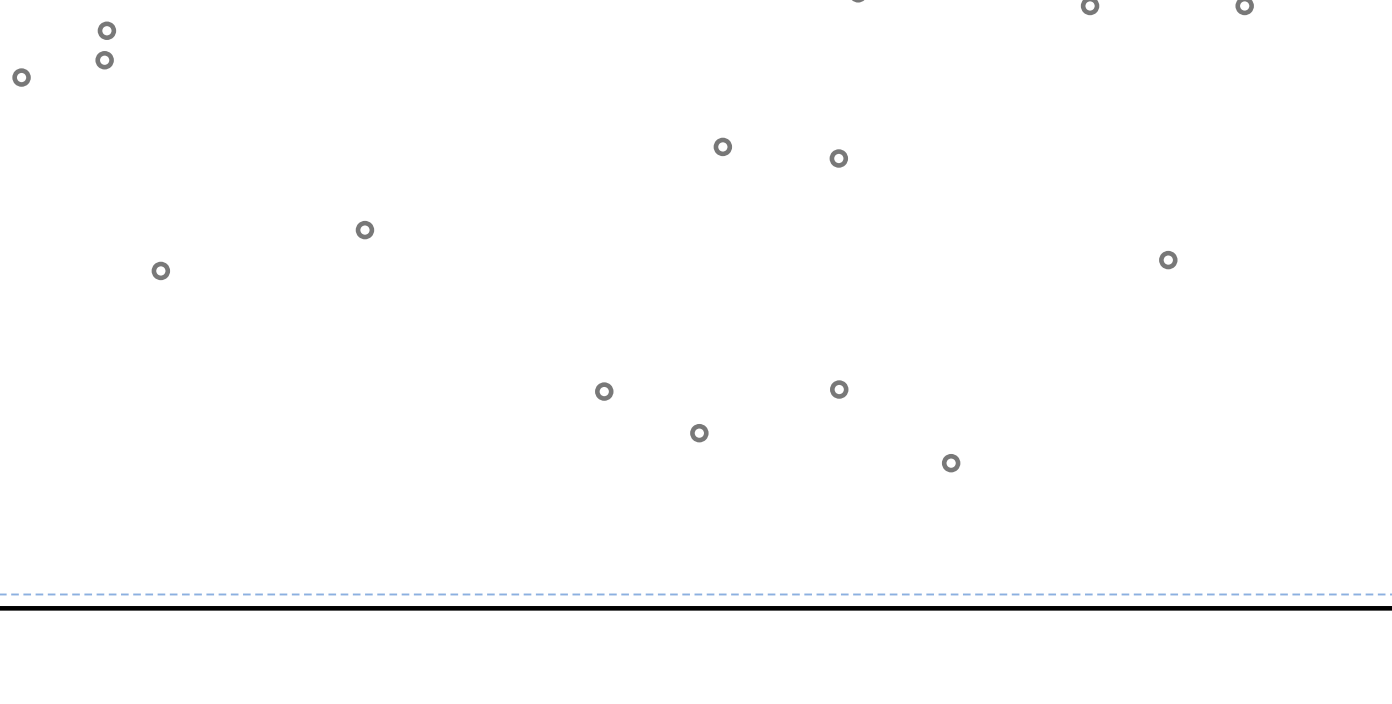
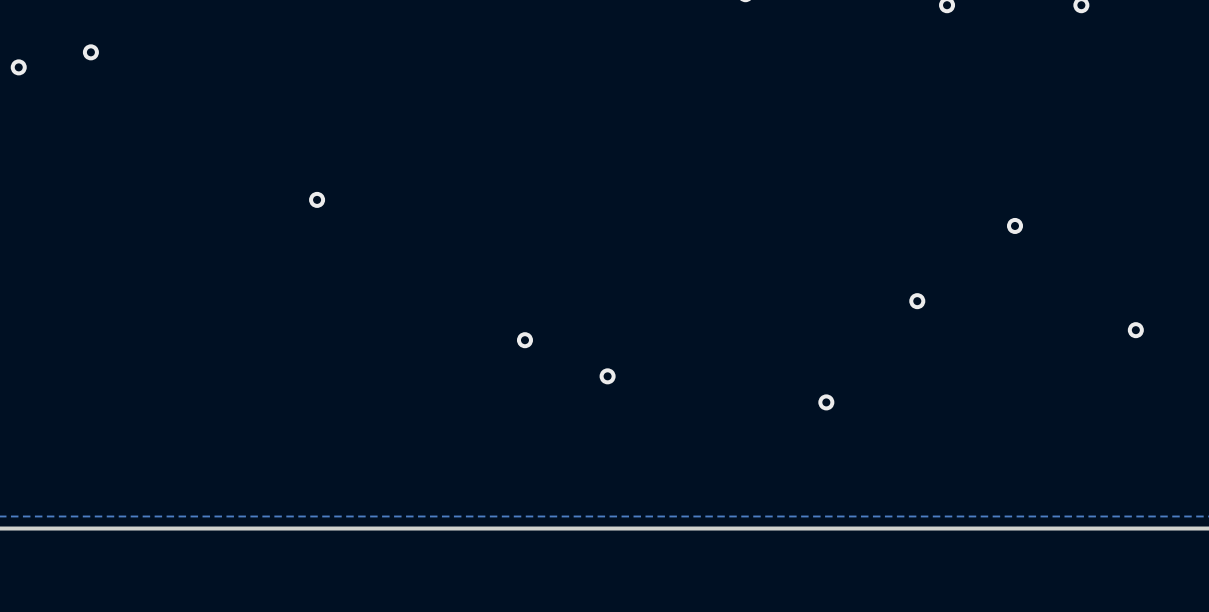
via: (106, 30) -> none
via: (722, 146) -> none
via: (838, 158) -> none
via: (160, 270) -> none
via: none -> (917, 301)
via: none -> (1135, 330)
via: (839, 389) -> none

